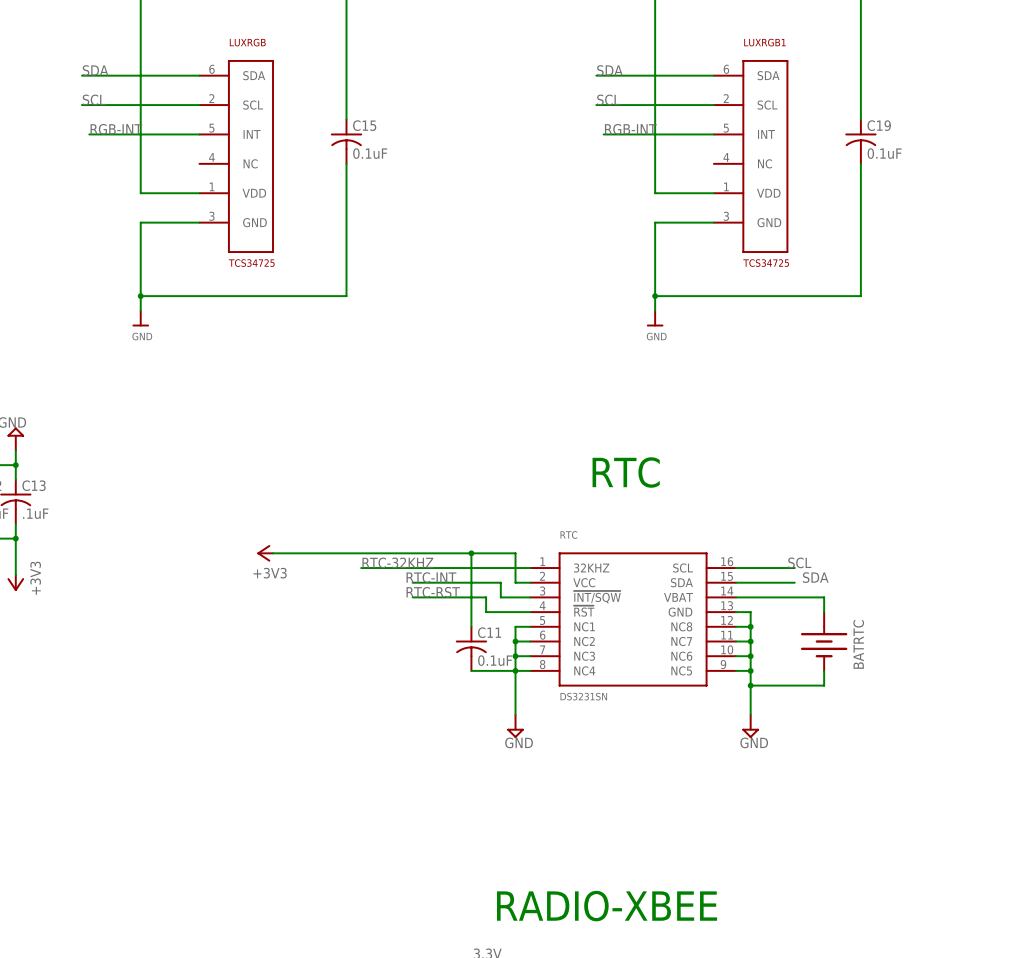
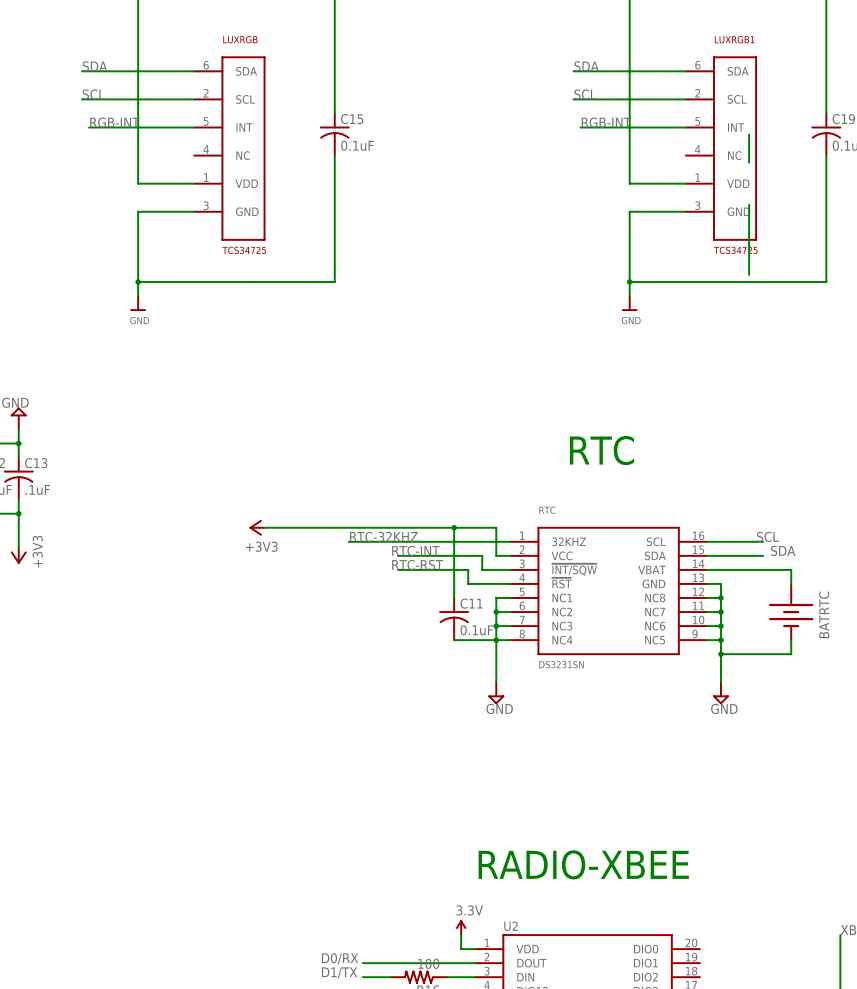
wire: none -> (749, 134) (749, 162)
wire: none -> (749, 204) (749, 274)

